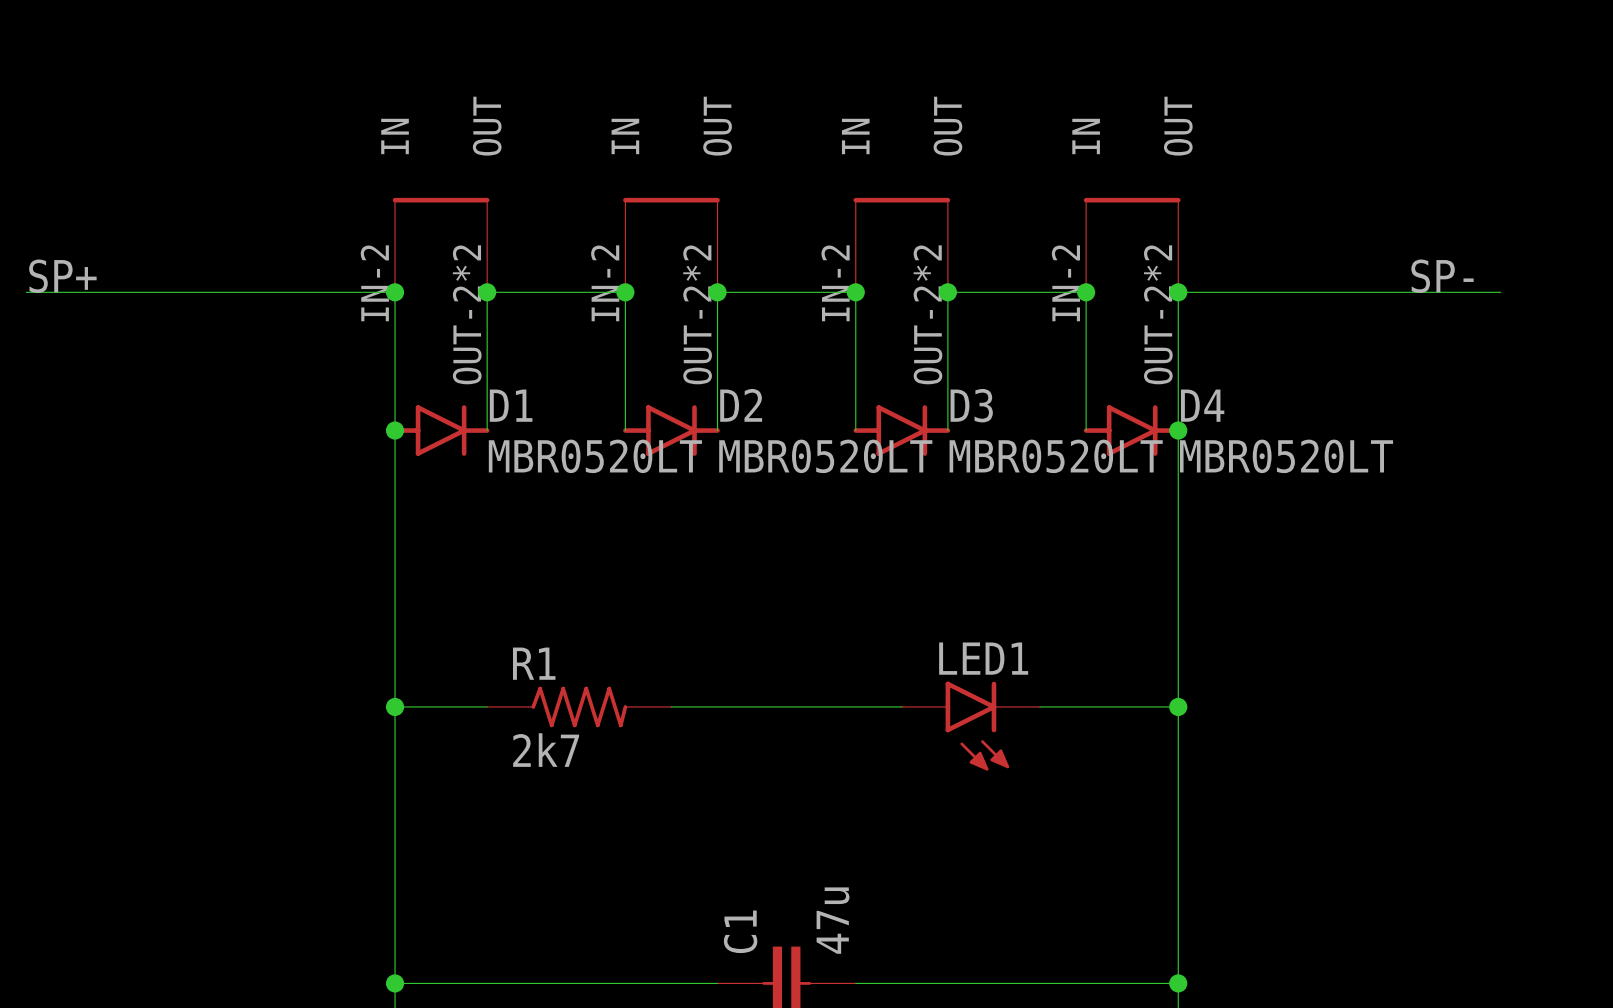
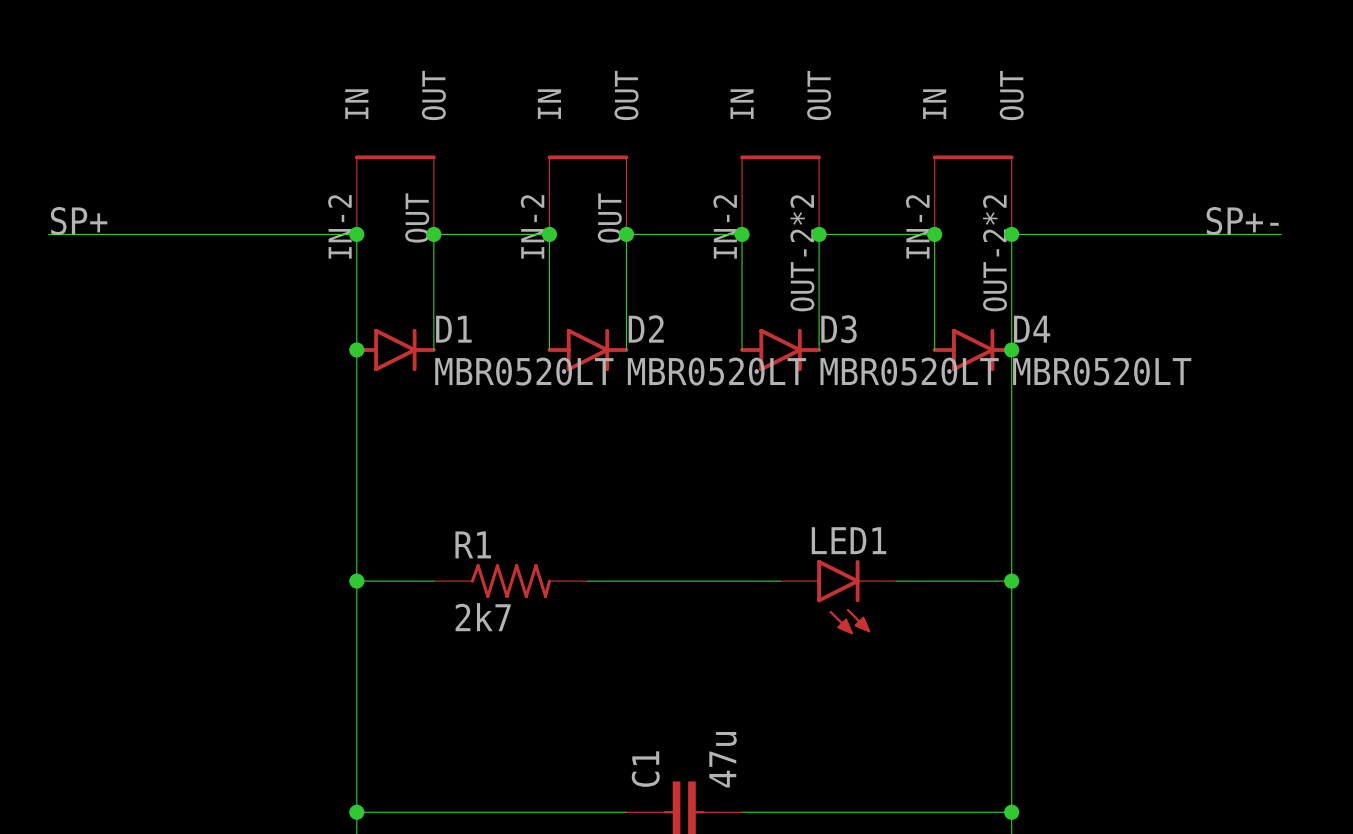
label: SP- (1442, 276) -> SP+- (1242, 220)
part pin number: OUT-2*2 (467, 314) -> OUT (417, 217)
part pin number: OUT-2*2 (697, 314) -> OUT (609, 217)

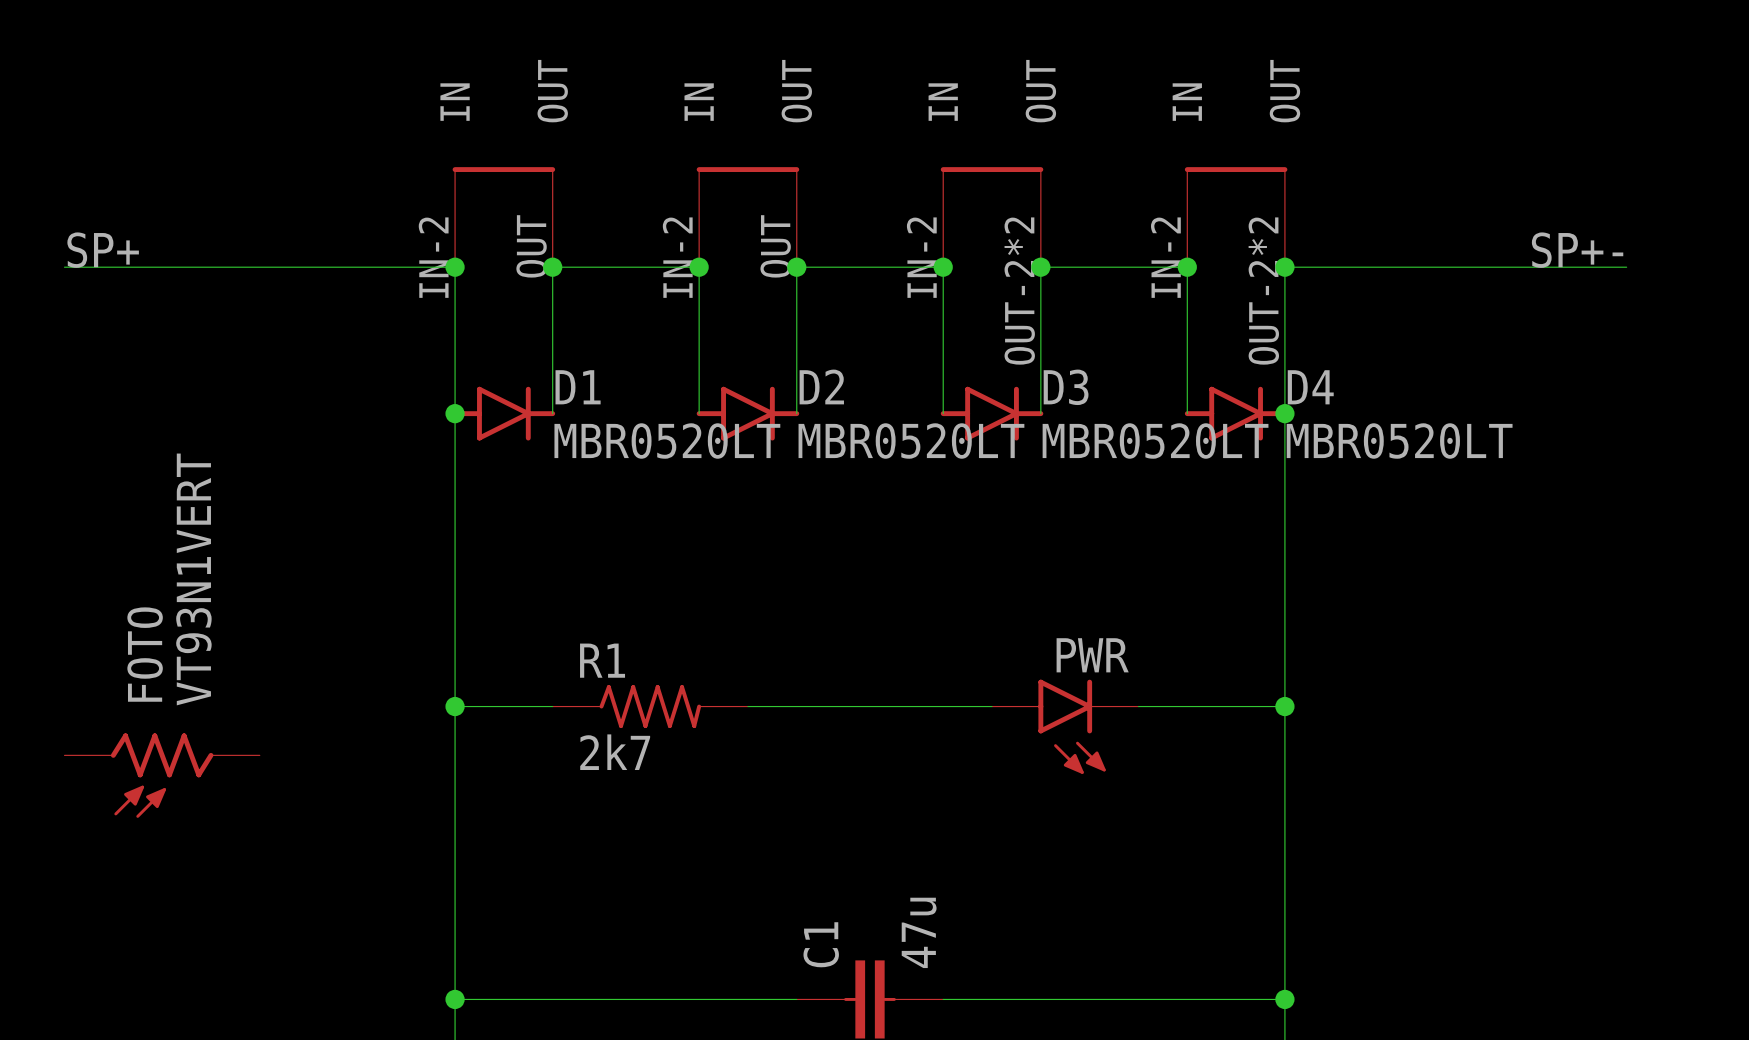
LED1 name: LED1 (848, 540) -> PWR (1092, 655)
FOTO: none -> VT93N1VERT (162, 775)

